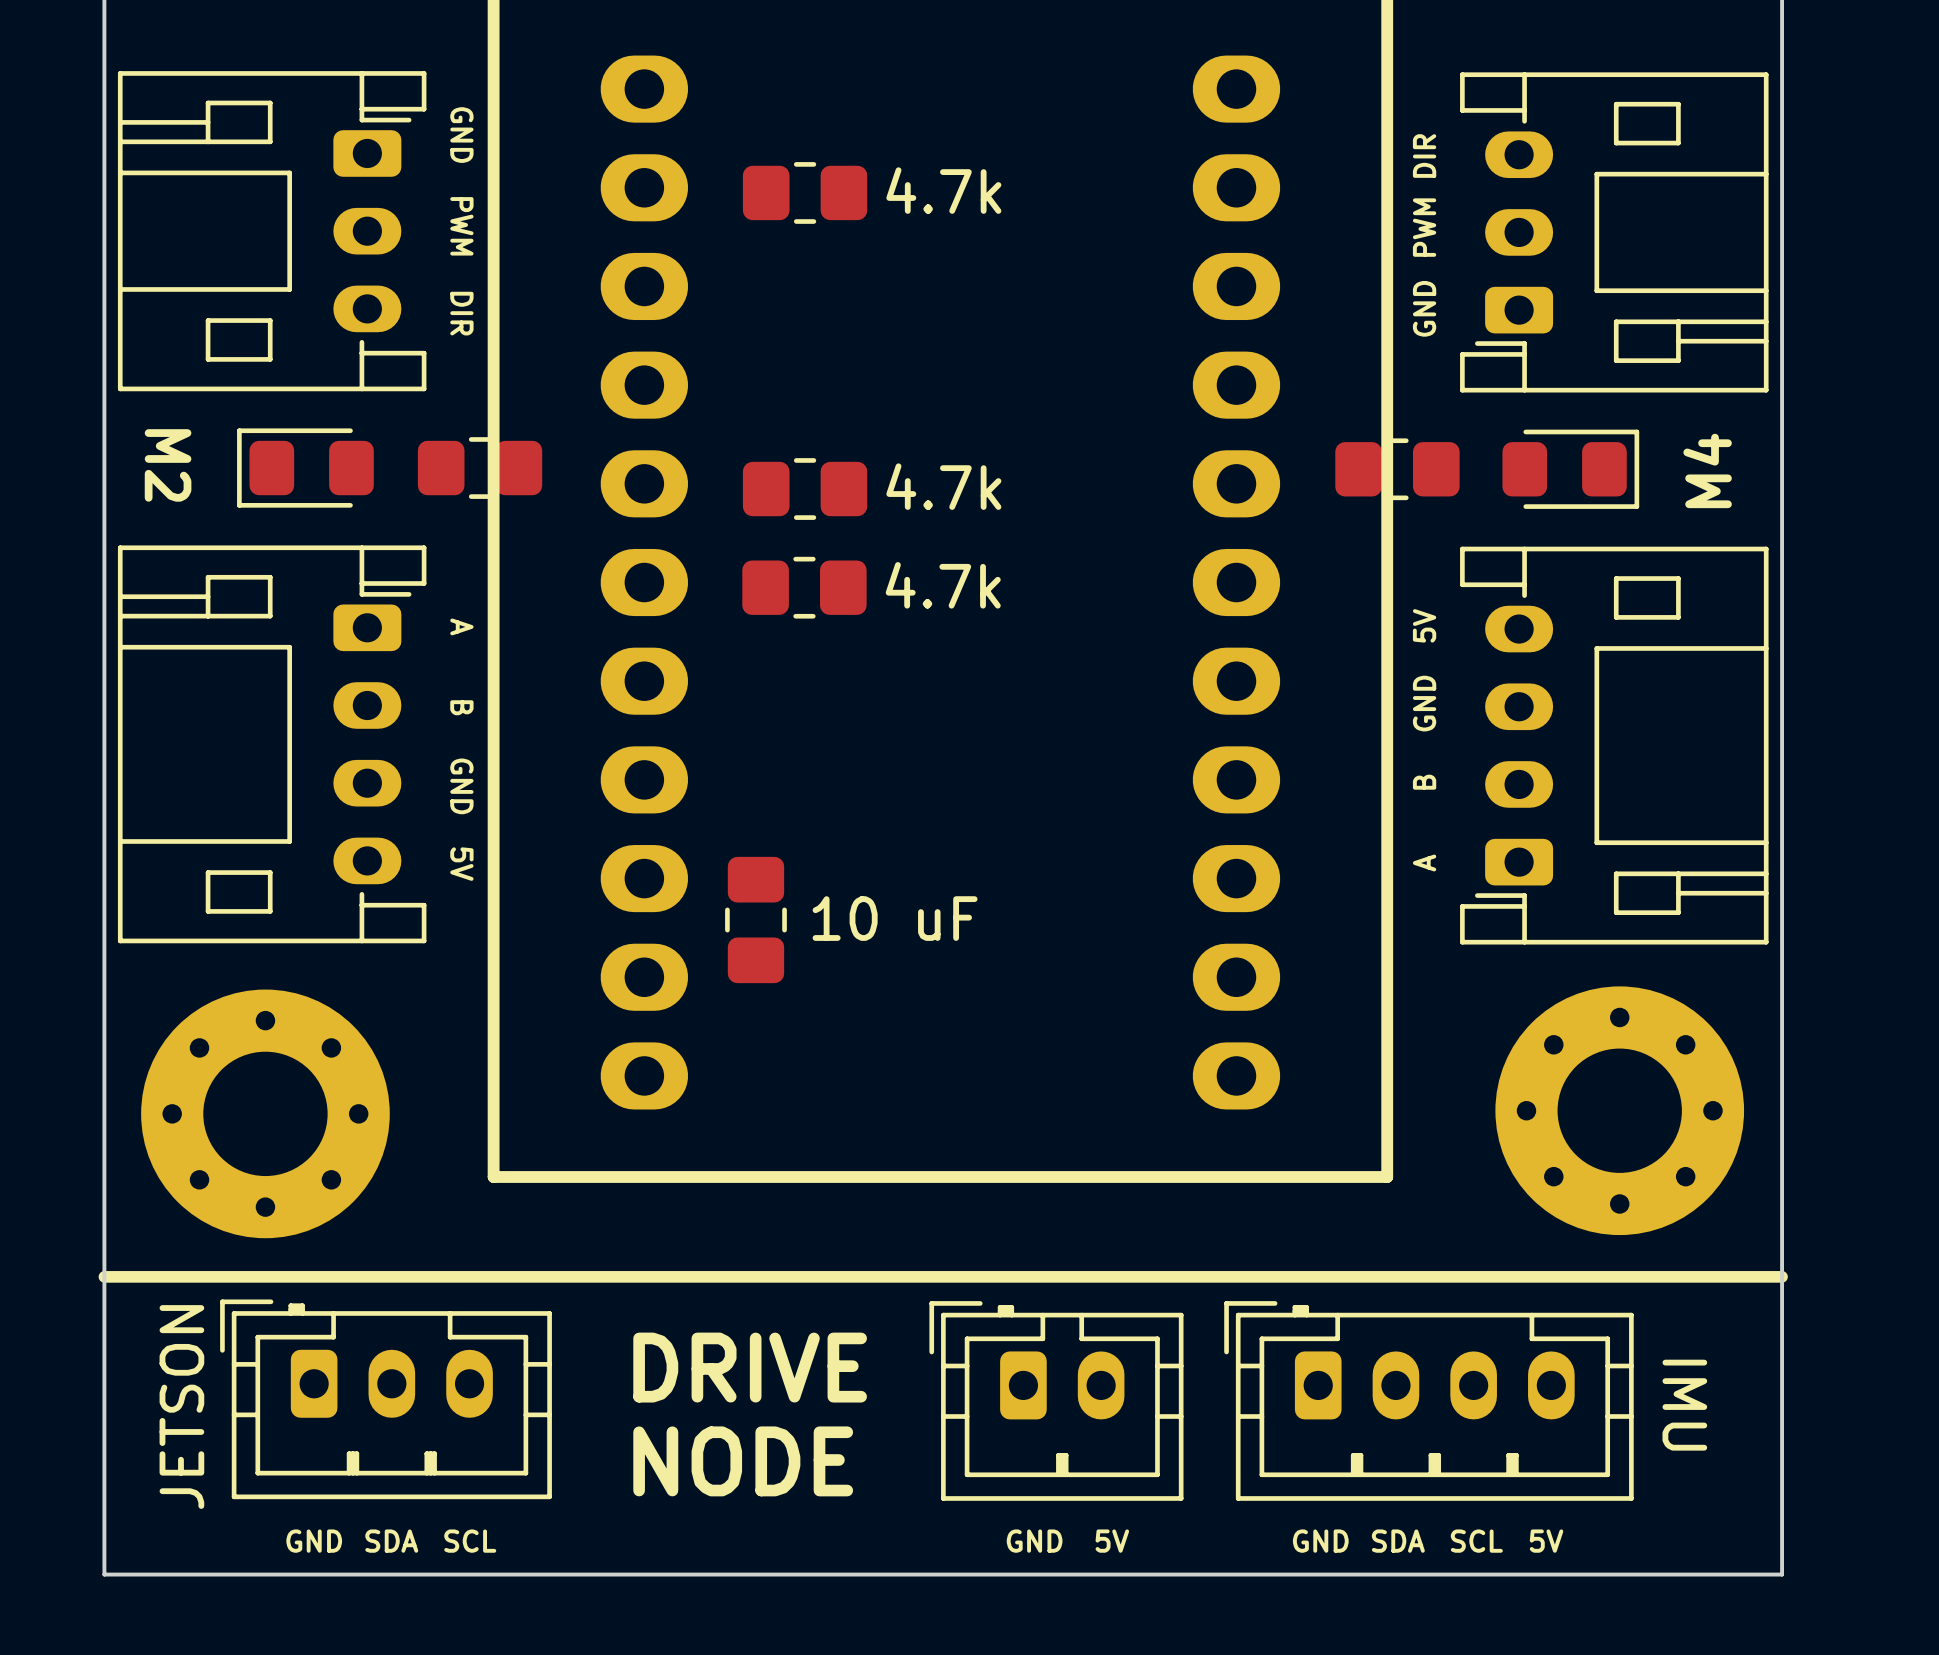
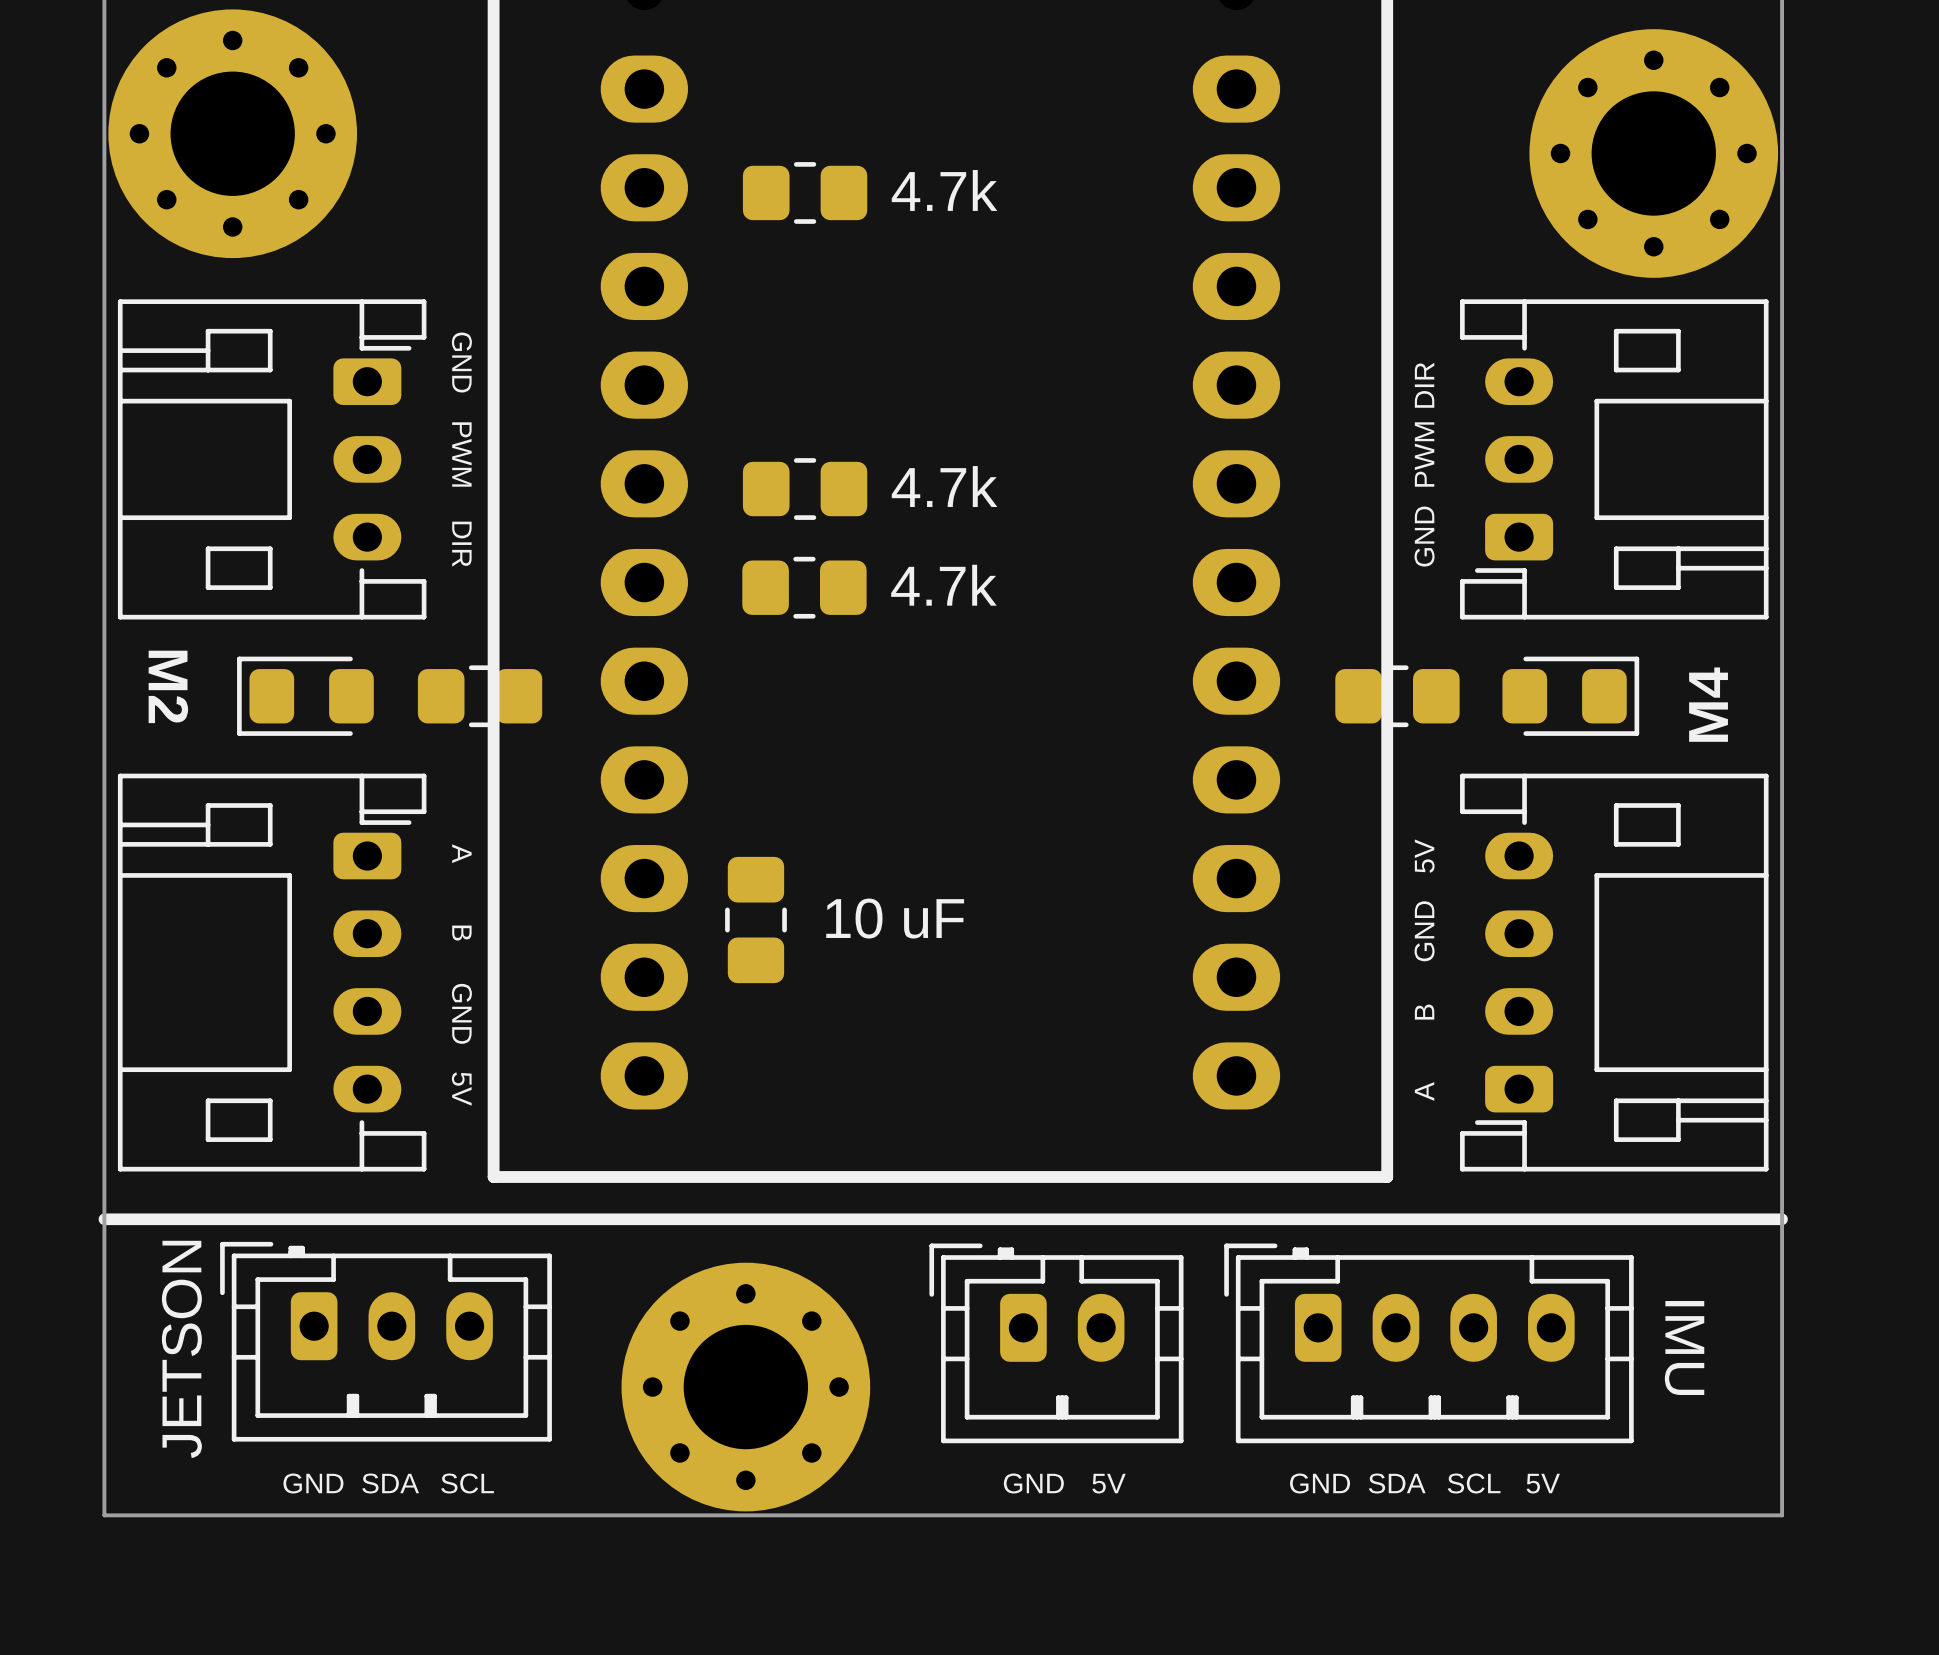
part: none -> (232, 133)
text: GND (461, 135) -> none
part: none -> (1653, 153)
text position: DIR (1424, 156) -> DIR (1424, 385)
text position: PWM (461, 226) -> PWM (461, 454)
text position: PWM (1424, 227) -> PWM (1424, 454)
part: (272, 231) -> none
part position: (1614, 232) -> (1614, 459)
text: GND (1424, 308) -> none
text position: DIR (461, 313) -> DIR (461, 544)
text: none -> GND (461, 362)
part footprint: [237, 428, 374, 508] -> [117, 299, 427, 620]
text position: M2 (168, 465) -> M2 (168, 686)
part position: (480, 468) -> (480, 696)
part position: (1397, 469) -> (1397, 696)
part position: (1570, 469) -> (1570, 696)
text position: M4 (1707, 470) -> M4 (1708, 704)
text: none -> GND (1424, 536)
text: 5V (1424, 625) -> none
text: A (461, 626) -> none
part: none -> (305, 696)
text: GND (1424, 703) -> none
text position: B (461, 707) -> B (461, 933)
part position: (272, 744) -> (272, 972)
part position: (1614, 745) -> (1614, 972)
text position: B (1424, 782) -> B (1424, 1012)
text: GND (461, 786) -> none
text: A (1424, 863) -> 5V (1424, 856)
text: 5V (461, 864) -> A (461, 853)
text: none -> GND (1424, 931)
text: none -> GND (461, 1013)
text: none -> A (1424, 1091)
text: none -> 5V (461, 1089)
part: (1619, 1110) -> none
part: (265, 1113) -> none
line: (104, 1276) (1782, 1276) -> (104, 1219) (1782, 1219)
text: DRIVE (750, 1367) -> none
part: none -> (745, 1387)
part position: (386, 1399) -> (386, 1341)
part position: (1056, 1400) -> (1056, 1343)
part position: (1428, 1400) -> (1428, 1343)
text: NODE (743, 1461) -> none
board edge: (104, 1515) (104, 1574) (1782, 1574) (1782, 1515) -> (104, 1515) (1782, 1515)
text position: GND (314, 1541) -> GND (313, 1483)
text position: SDA (391, 1541) -> SDA (390, 1483)
text position: SCL (470, 1541) -> SCL (467, 1483)
text position: GND (1034, 1541) -> GND (1033, 1483)
text position: 5V (1112, 1541) -> 5V (1109, 1483)
text position: GND (1320, 1541) -> GND (1320, 1483)
text position: SDA (1398, 1541) -> SDA (1397, 1483)
text position: SCL (1476, 1541) -> SCL (1474, 1483)
text position: 5V (1546, 1541) -> 5V (1543, 1483)

